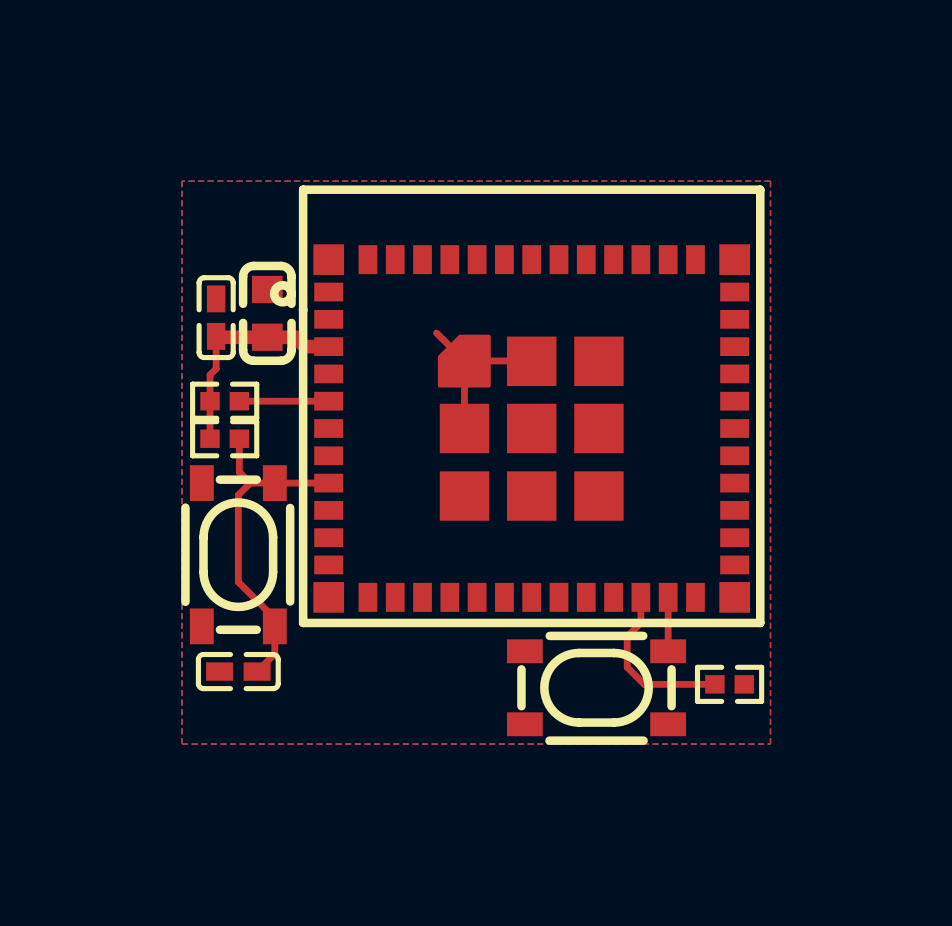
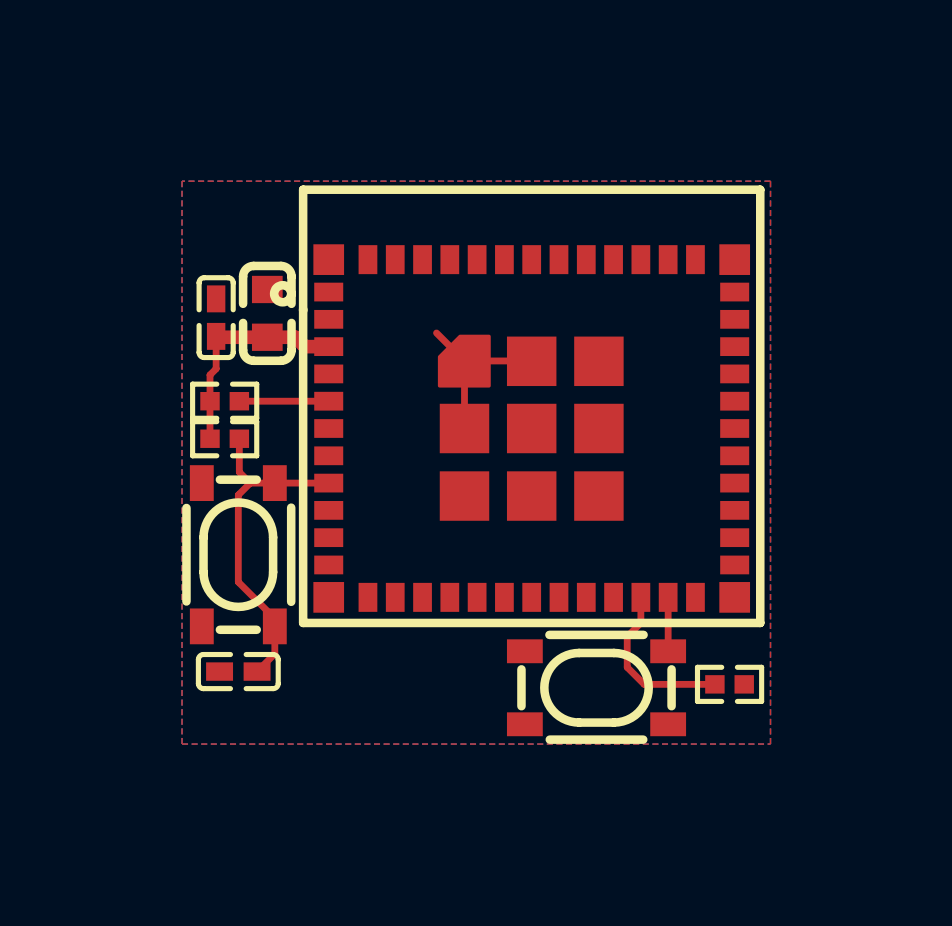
part rotation: 0° (237, 554) -> 180° (238, 554)
part rotation: 0° (596, 688) -> 180° (596, 687)

